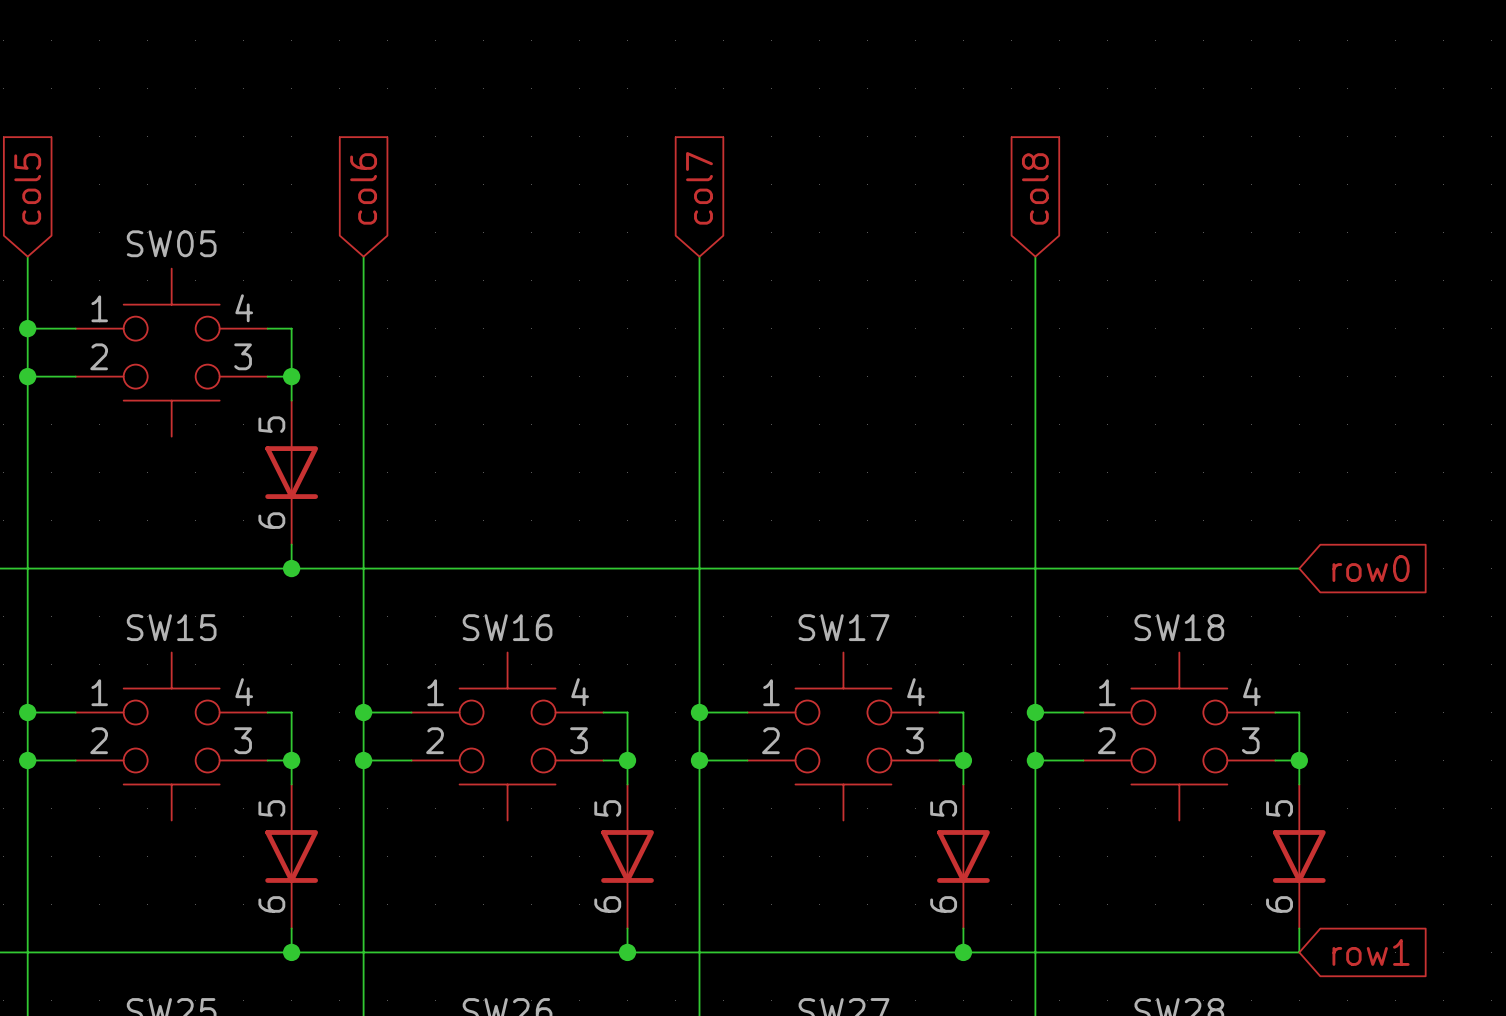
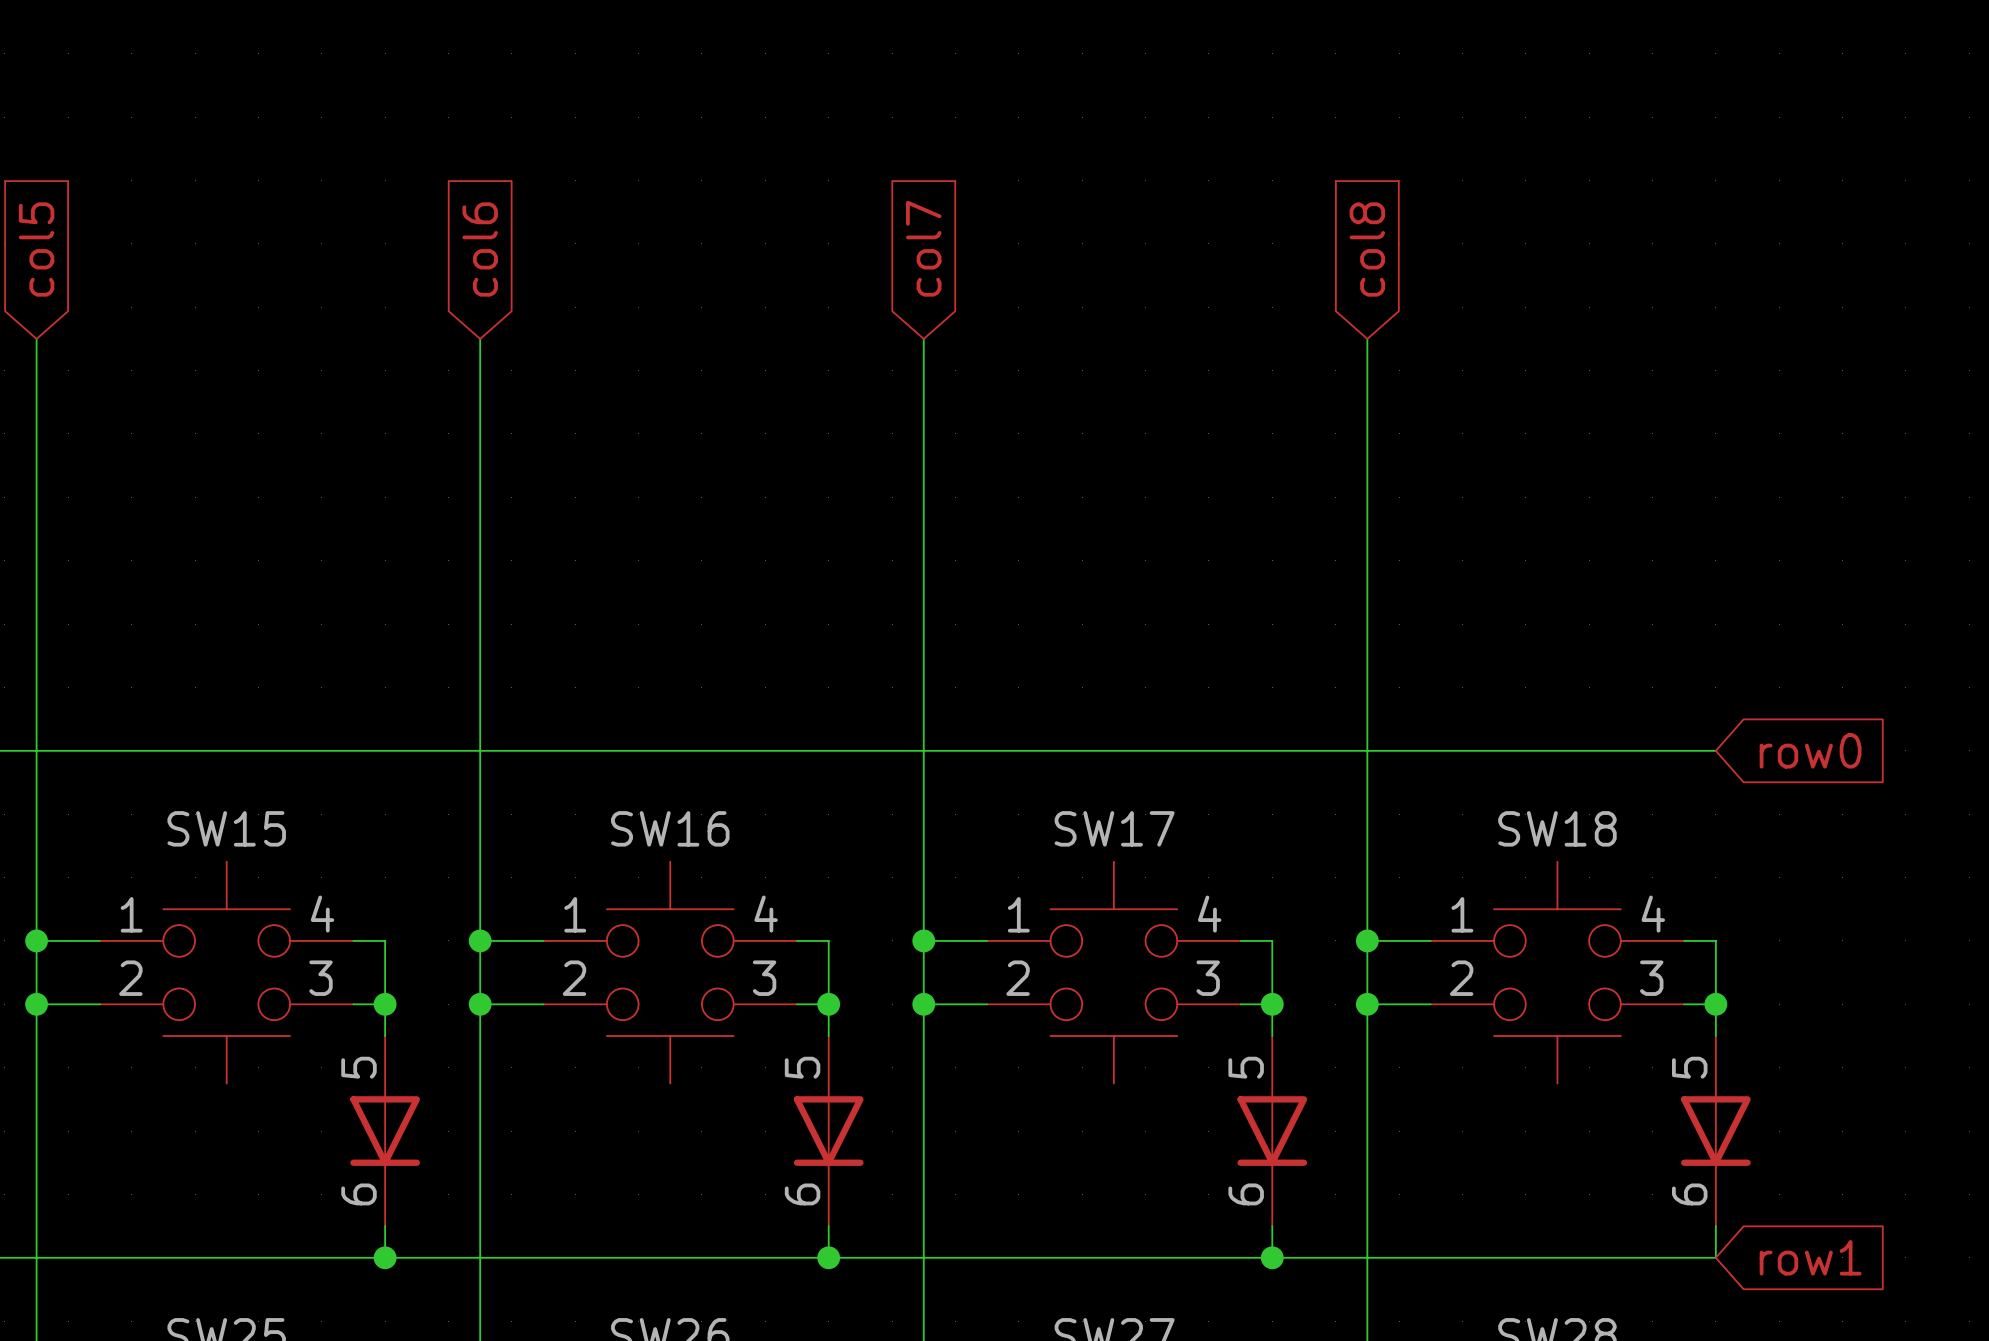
wire: (27, 328) (75, 328) -> none
junction: (27, 328) -> none
wire: (267, 328) (291, 328) (291, 400) -> none
wire: (27, 376) (75, 376) -> none
junction: (27, 376) -> none
wire: (267, 376) (291, 376) -> none
junction: (291, 376) -> none
SW05: (196, 406) -> none
wire: (291, 544) (291, 568) -> none
junction: (291, 568) -> none

